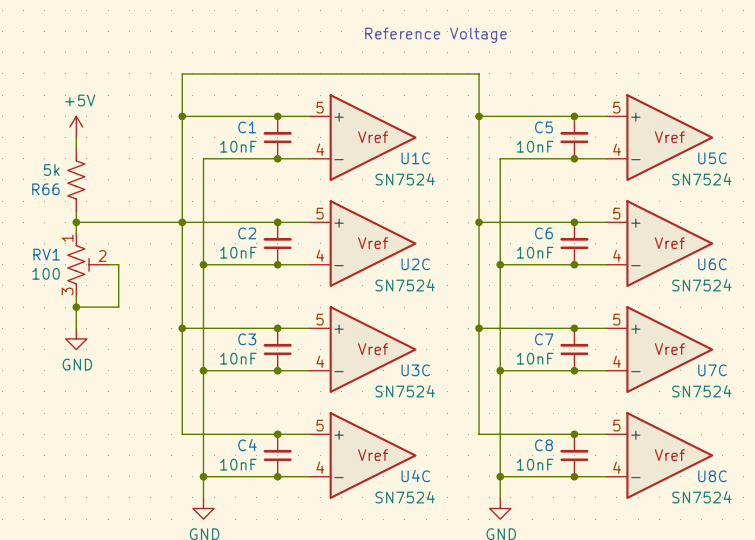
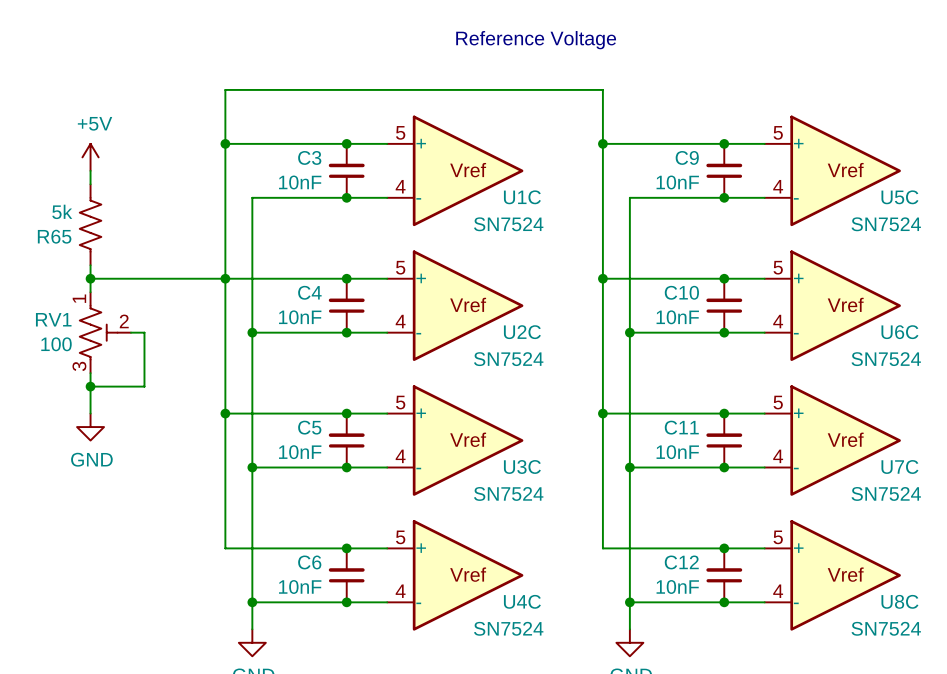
C1 name: C1 (247, 127) -> C3 (309, 157)
C5 name: C5 (543, 127) -> C9 (687, 157)
R66 name: R66 (45, 189) -> R65 (54, 236)
C2 name: C2 (247, 233) -> C4 (309, 292)
C6 name: C6 (543, 233) -> C10 (681, 292)
C3 name: C3 (247, 339) -> C5 (309, 427)
C7 name: C7 (544, 339) -> C11 (681, 427)
C4 name: C4 (247, 445) -> C6 (309, 562)
C8 name: C8 (543, 445) -> C12 (681, 562)

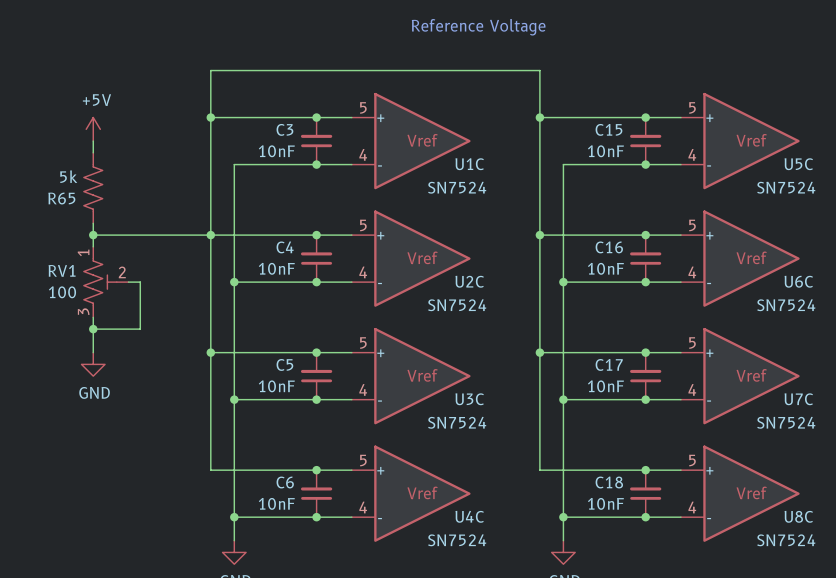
C9 name: C9 (687, 157) -> C15 (608, 129)
C10 name: C10 (681, 292) -> C16 (609, 247)
C11 name: C11 (681, 427) -> C17 (609, 364)
C12 name: C12 (681, 562) -> C18 (609, 482)

